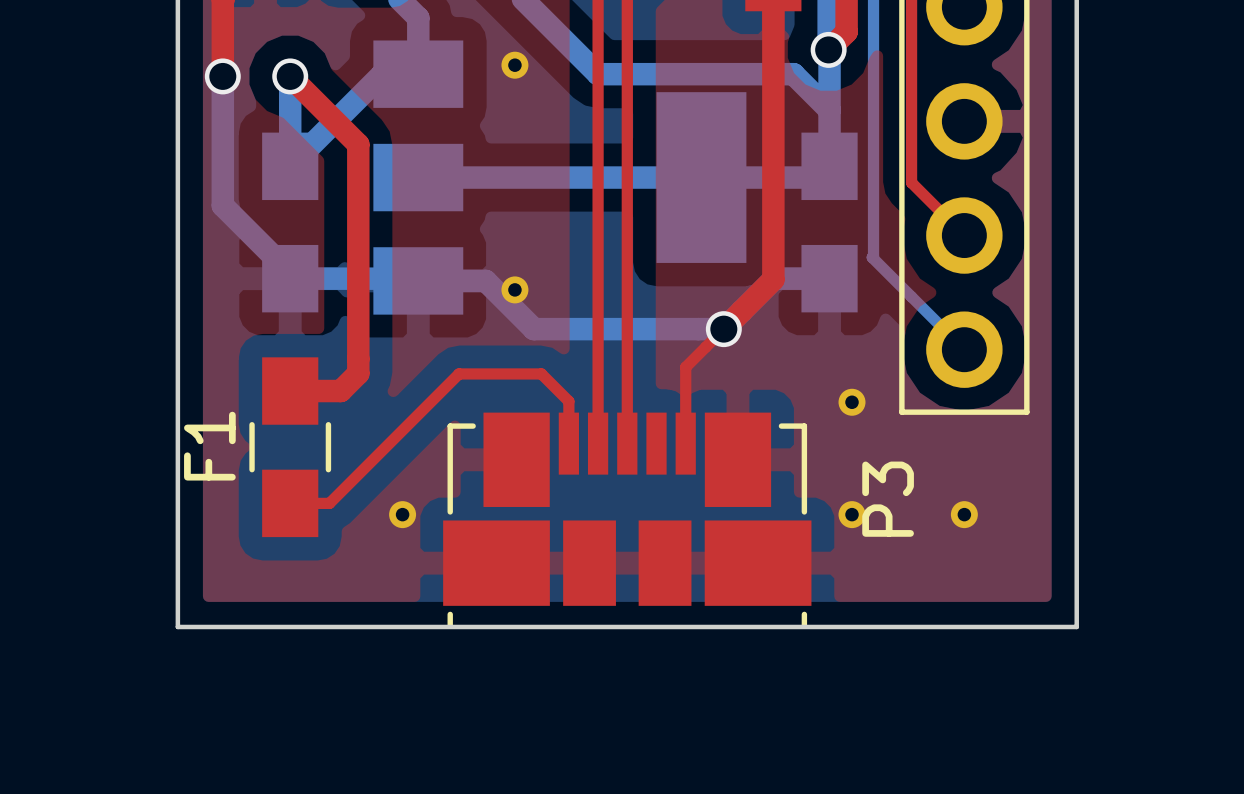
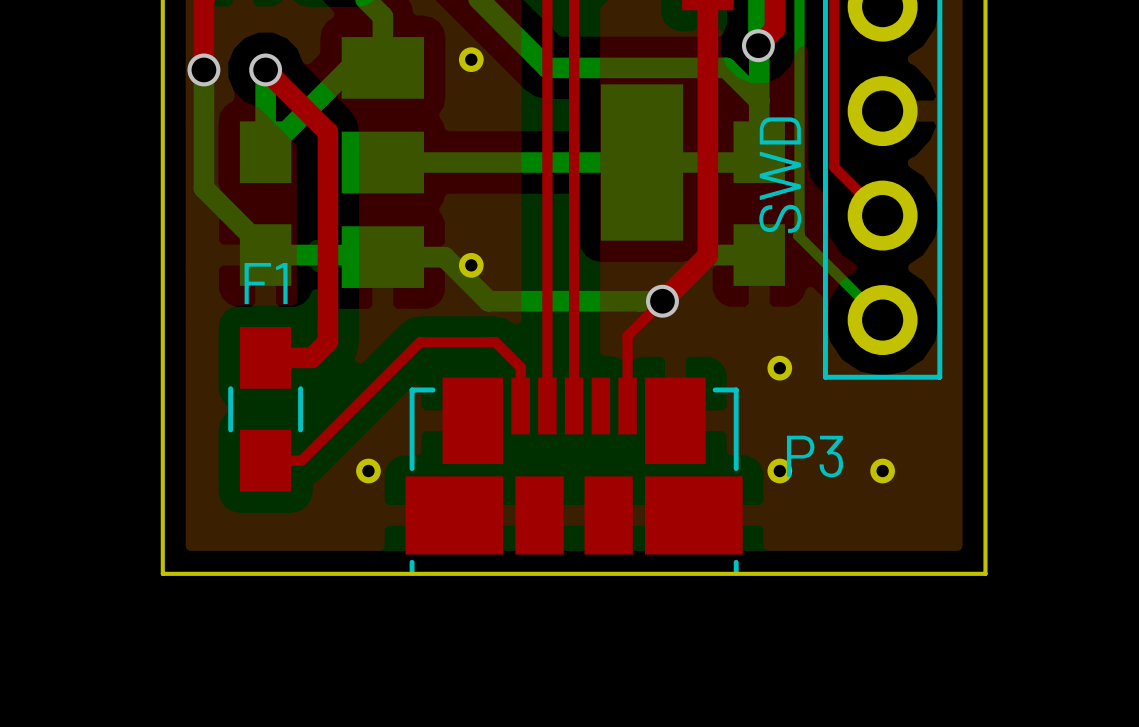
text: none -> SWD (780, 175)
F1 name rotation: 0° (209, 446) -> 90° clockwise (266, 283)
F1 name position: F1 (209, 446) -> F1 (266, 283)
P3 name rotation: 0° (888, 499) -> 90° clockwise (815, 456)

